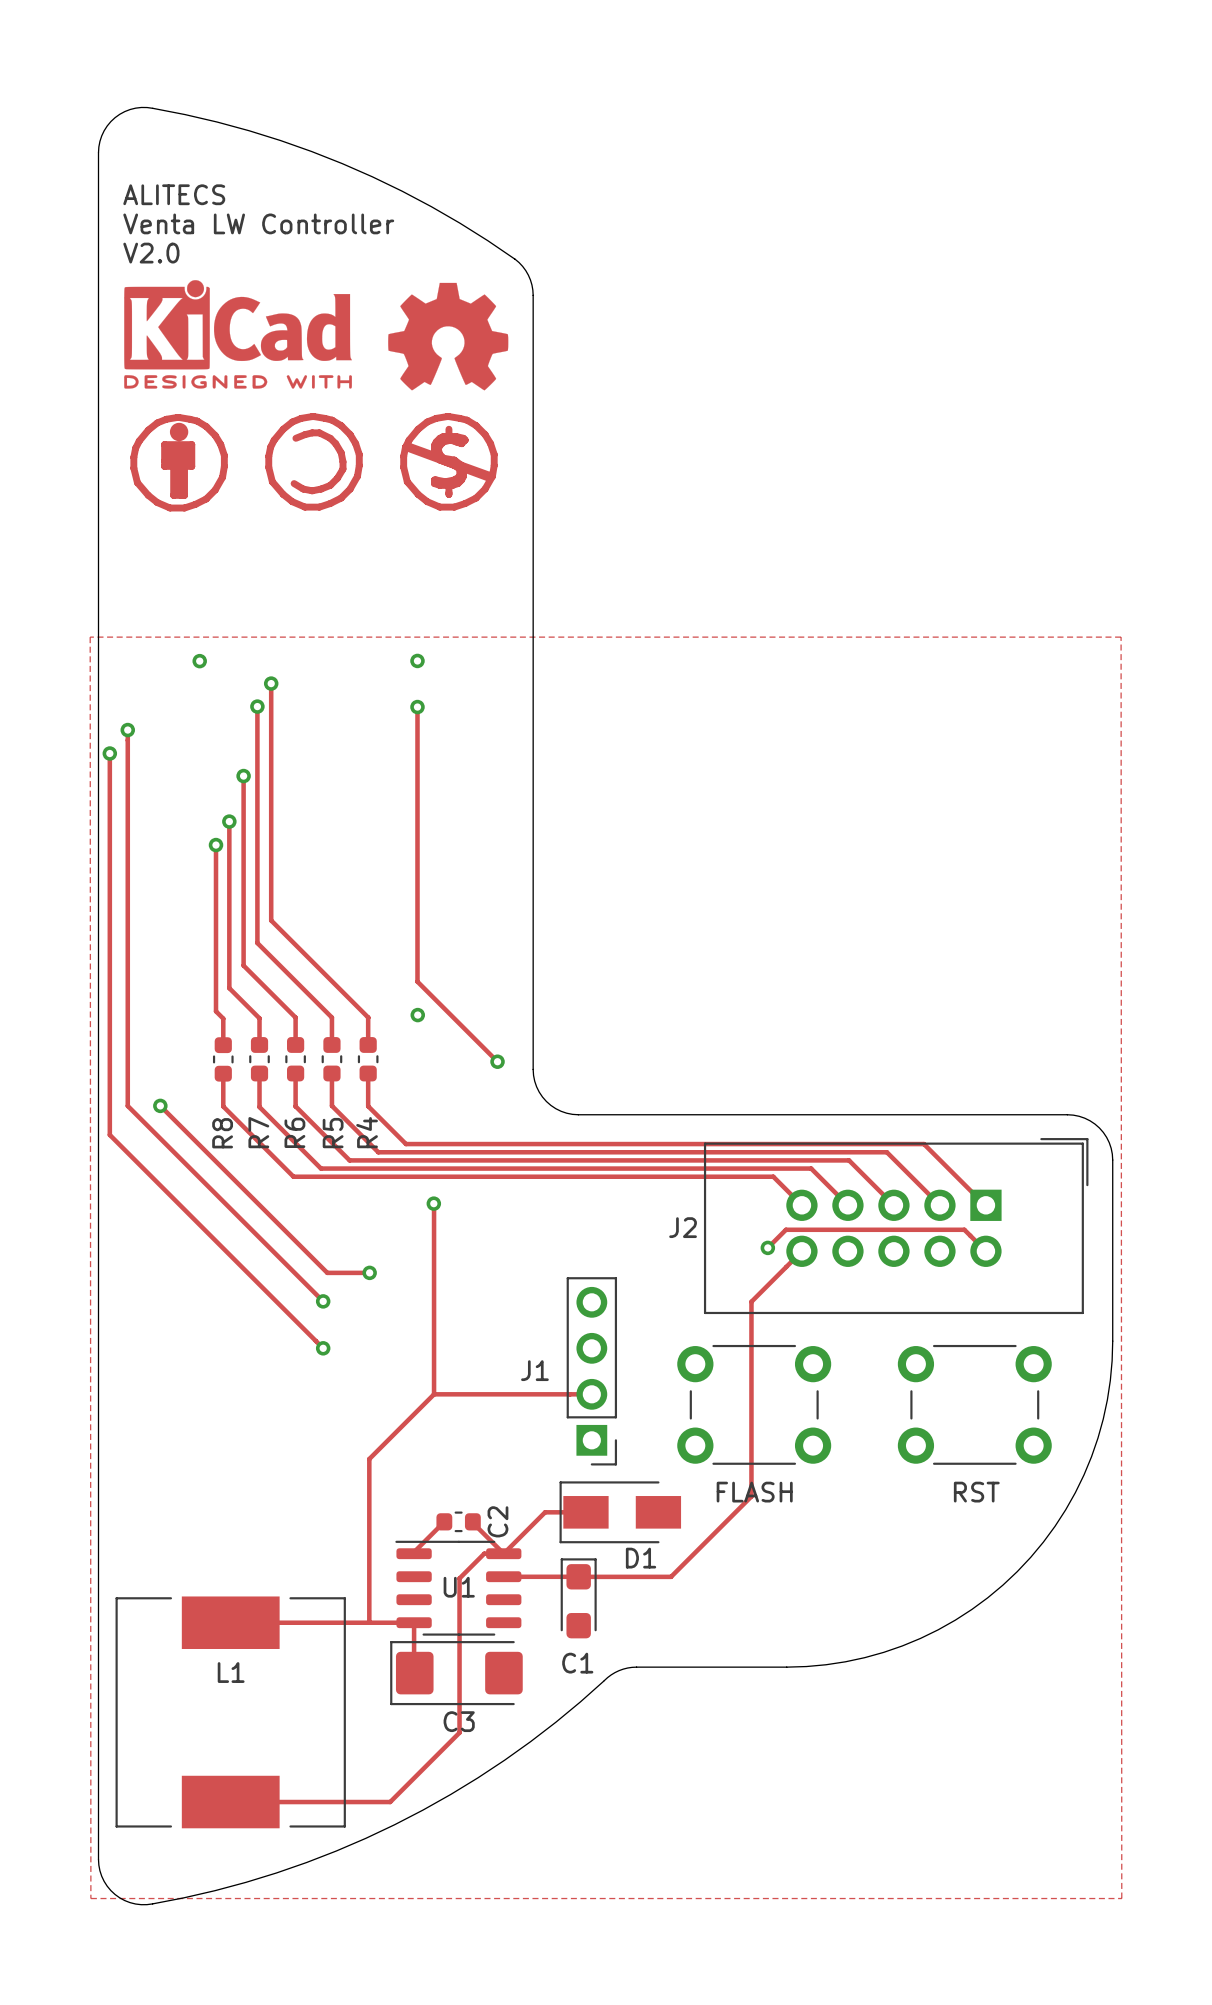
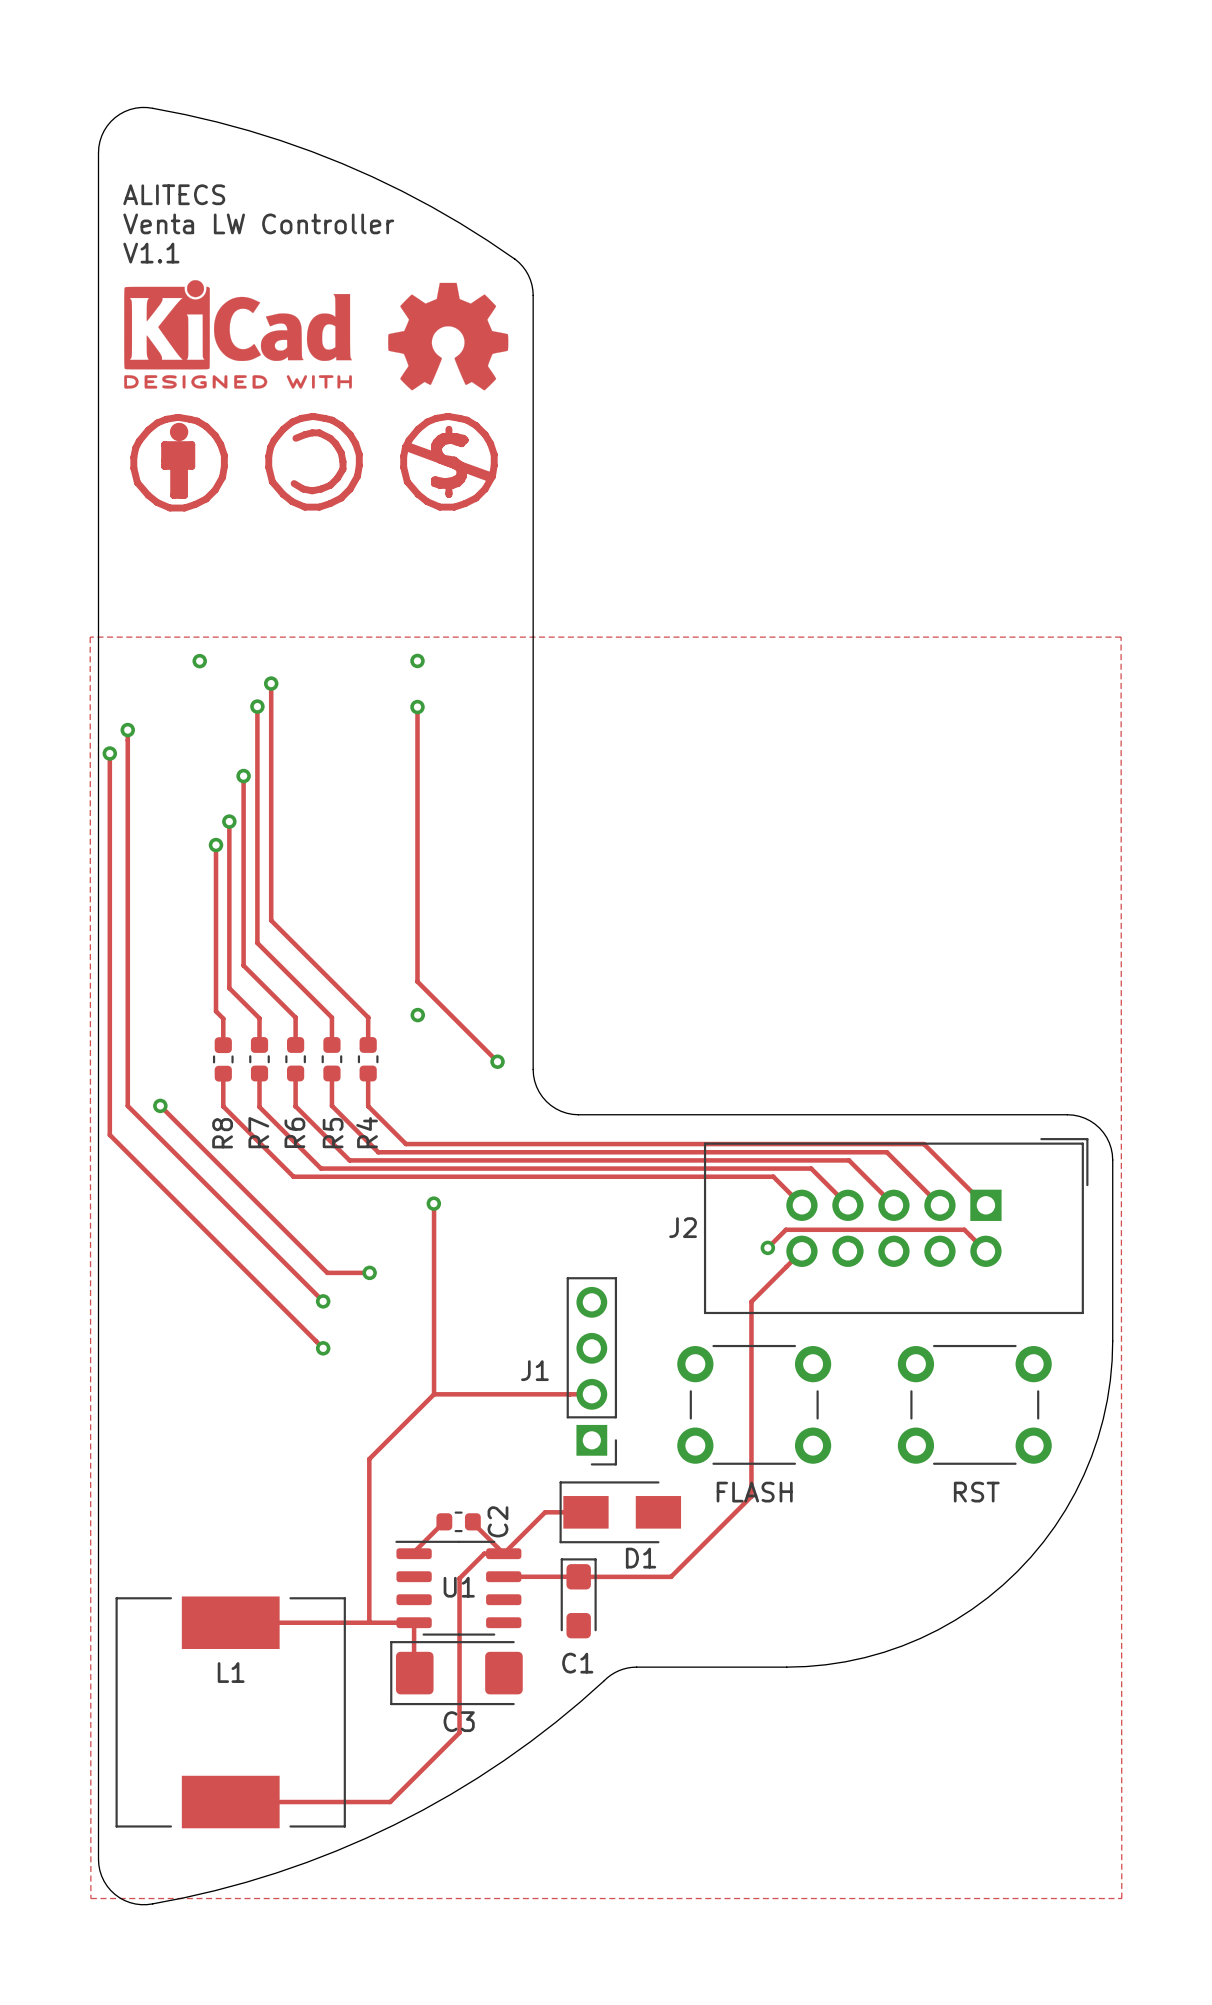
text: V2.0 (151, 253) -> V1.1 (151, 253)

